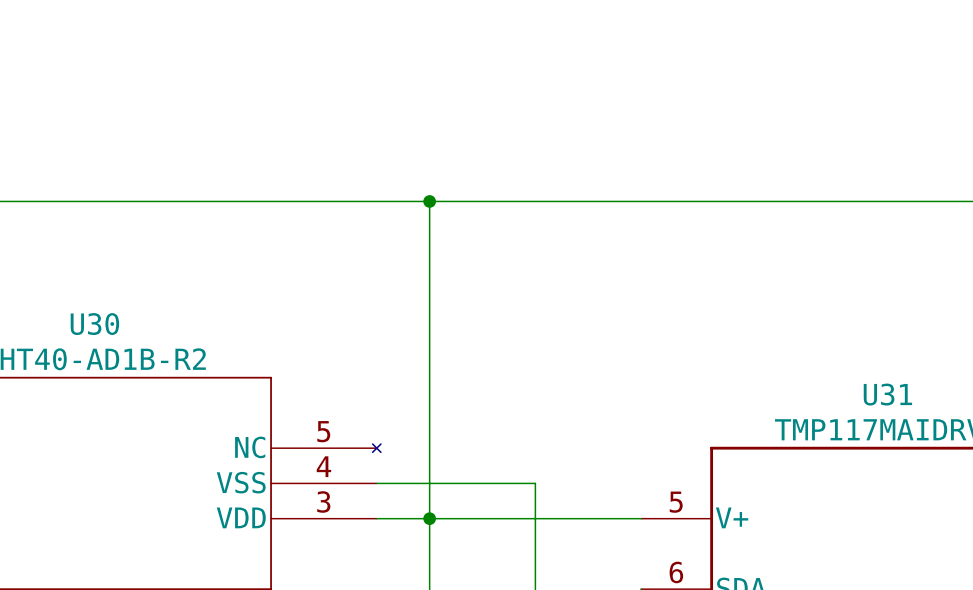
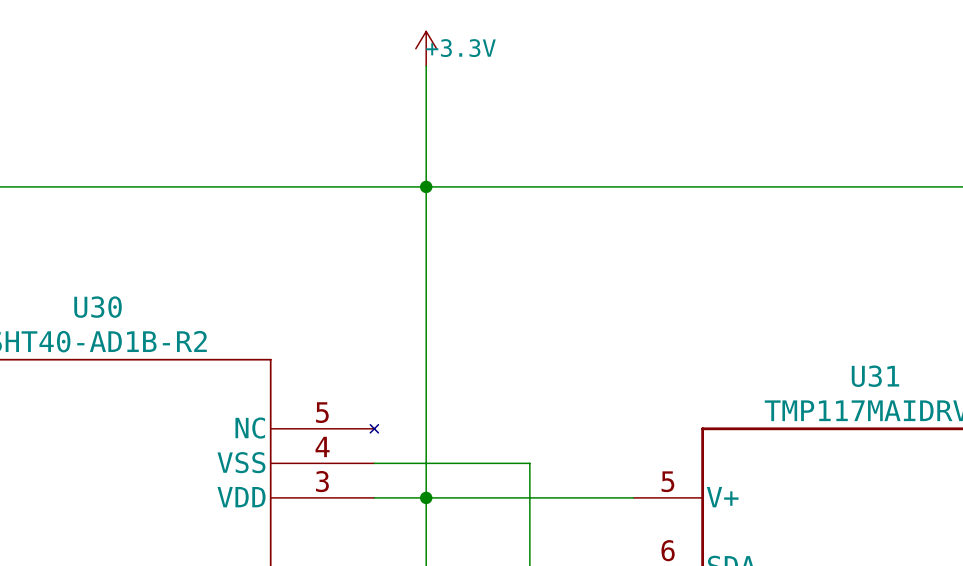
power symbol: none -> +3.3V (426, 48)
wire: none -> (426, 65) (426, 186)

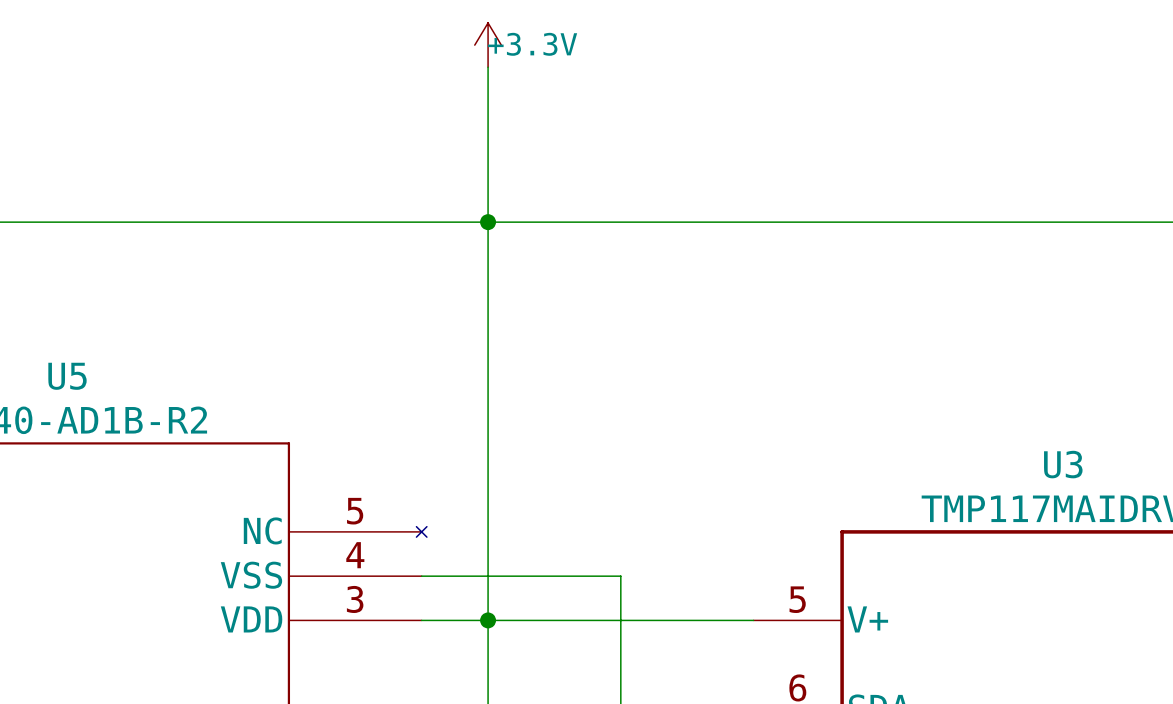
U30 name: U30 (98, 307) -> U5 (67, 376)
U31 name: U31 (875, 376) -> U3 (1063, 464)

